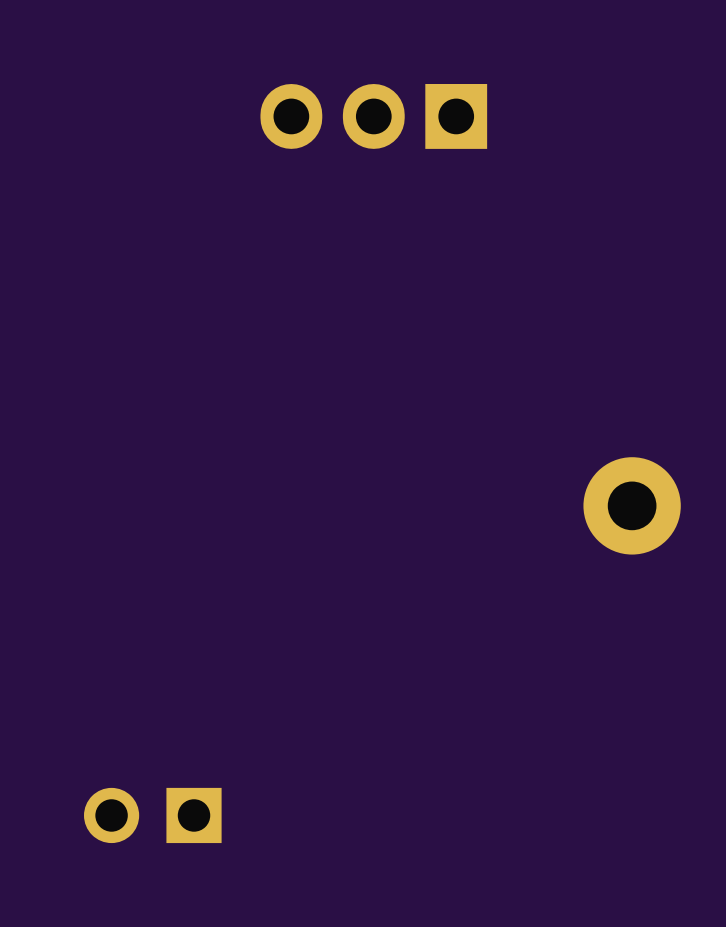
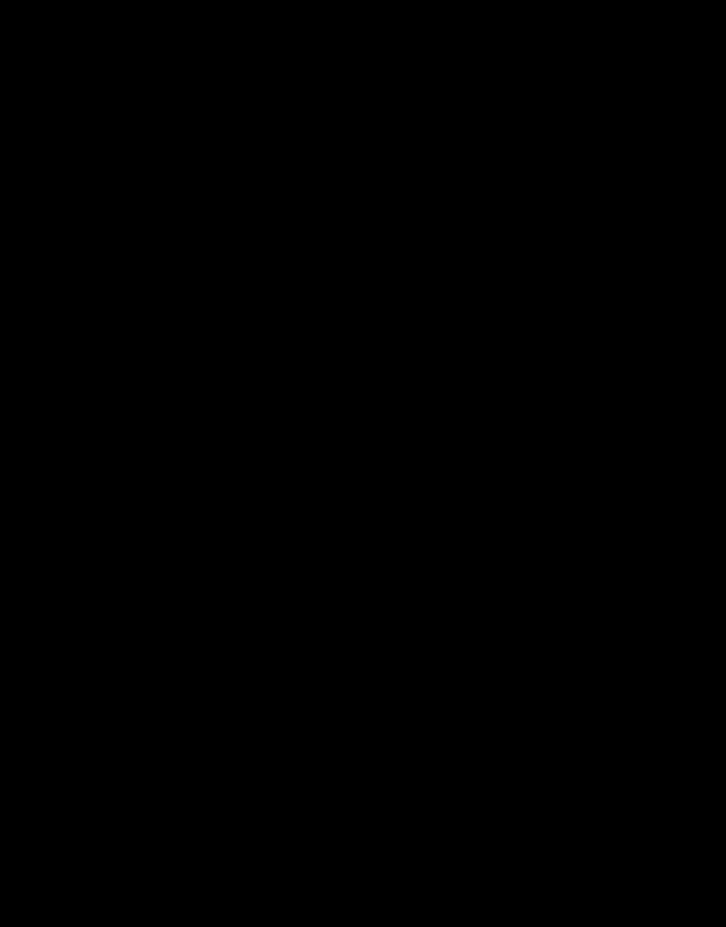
part: (373, 116) -> none
part: (632, 505) -> none
part: (152, 815) -> none

